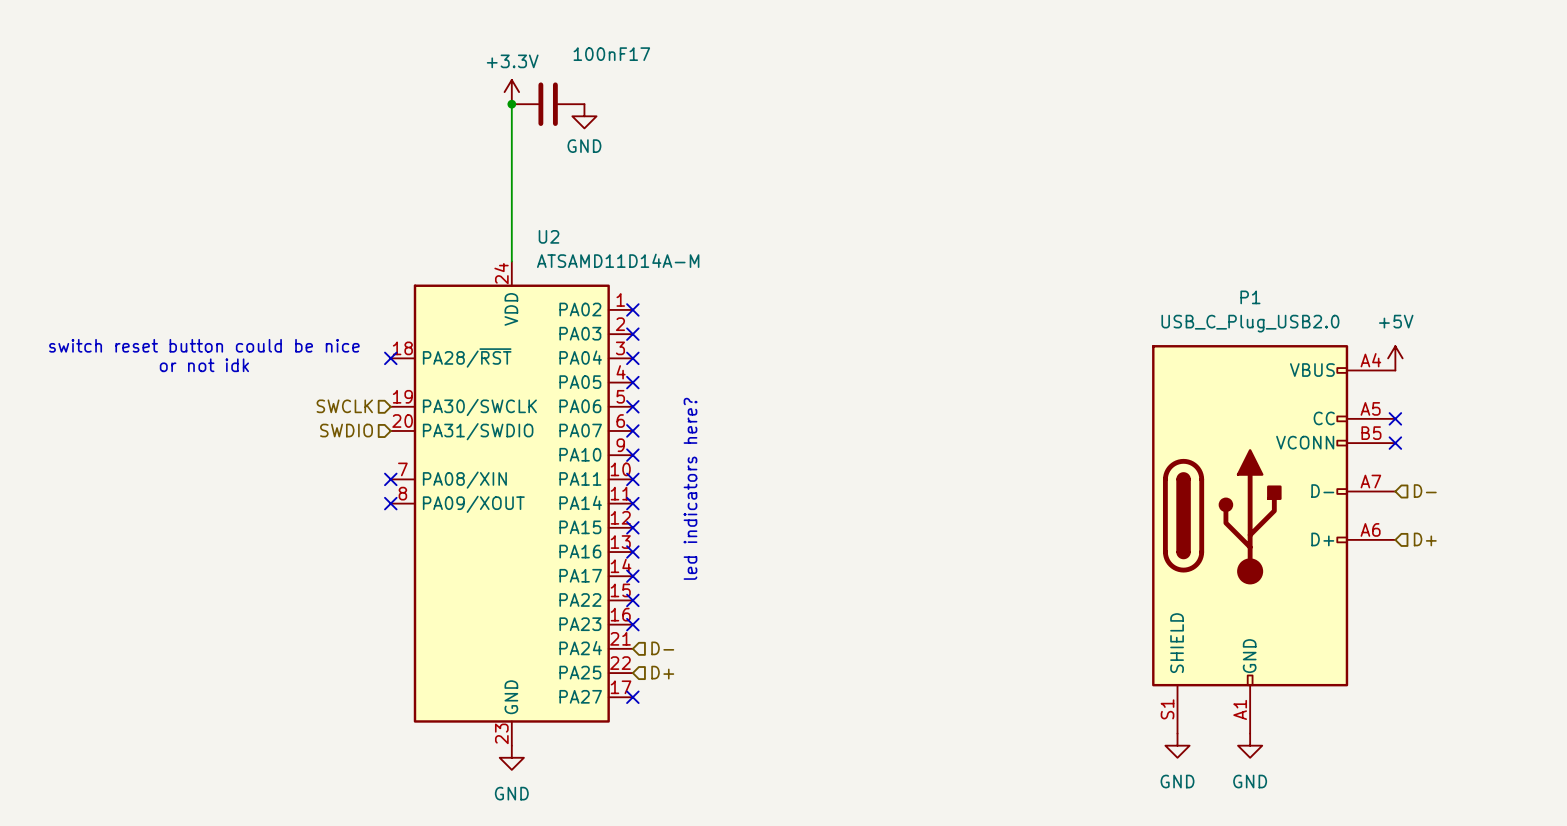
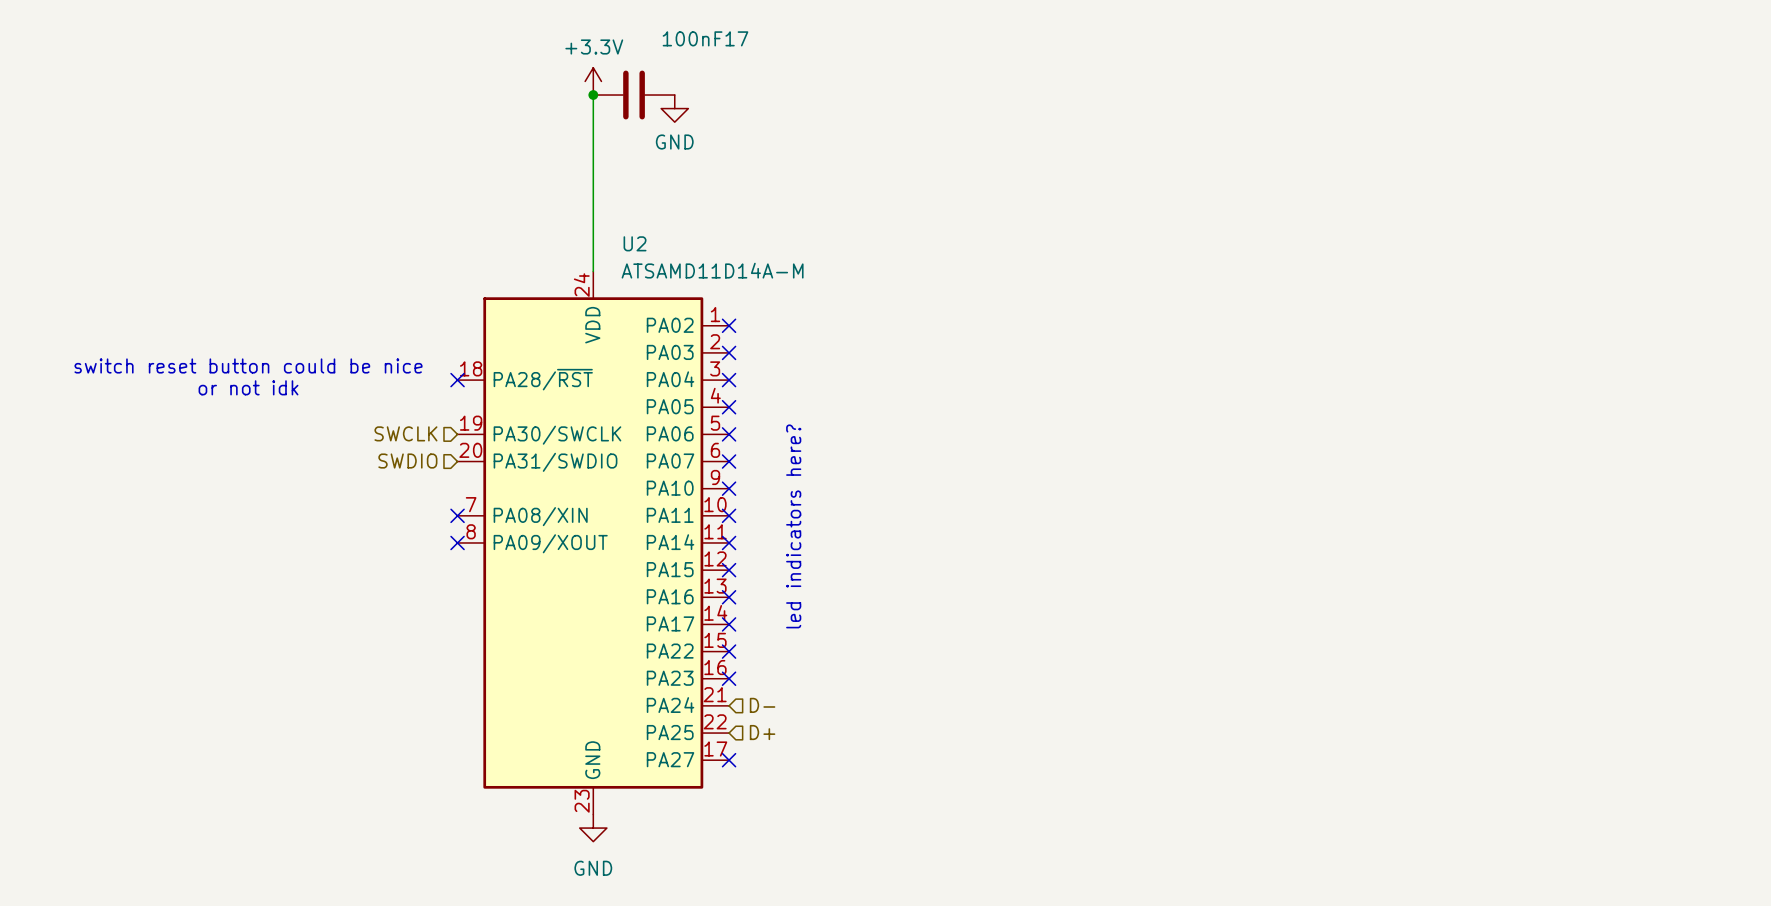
power symbol: +5V (1395, 358) -> none
no-connect mark: (1395, 418) -> none
no-connect mark: (1395, 443) -> none
hierarchical label: D- (1425, 491) -> none
P1: USB_C_Plug_USB2.0 (1273, 539) -> none
hierarchical label: D+ (1425, 539) -> none
power symbol: GND (1177, 745) -> none
power symbol: GND (1250, 745) -> none

